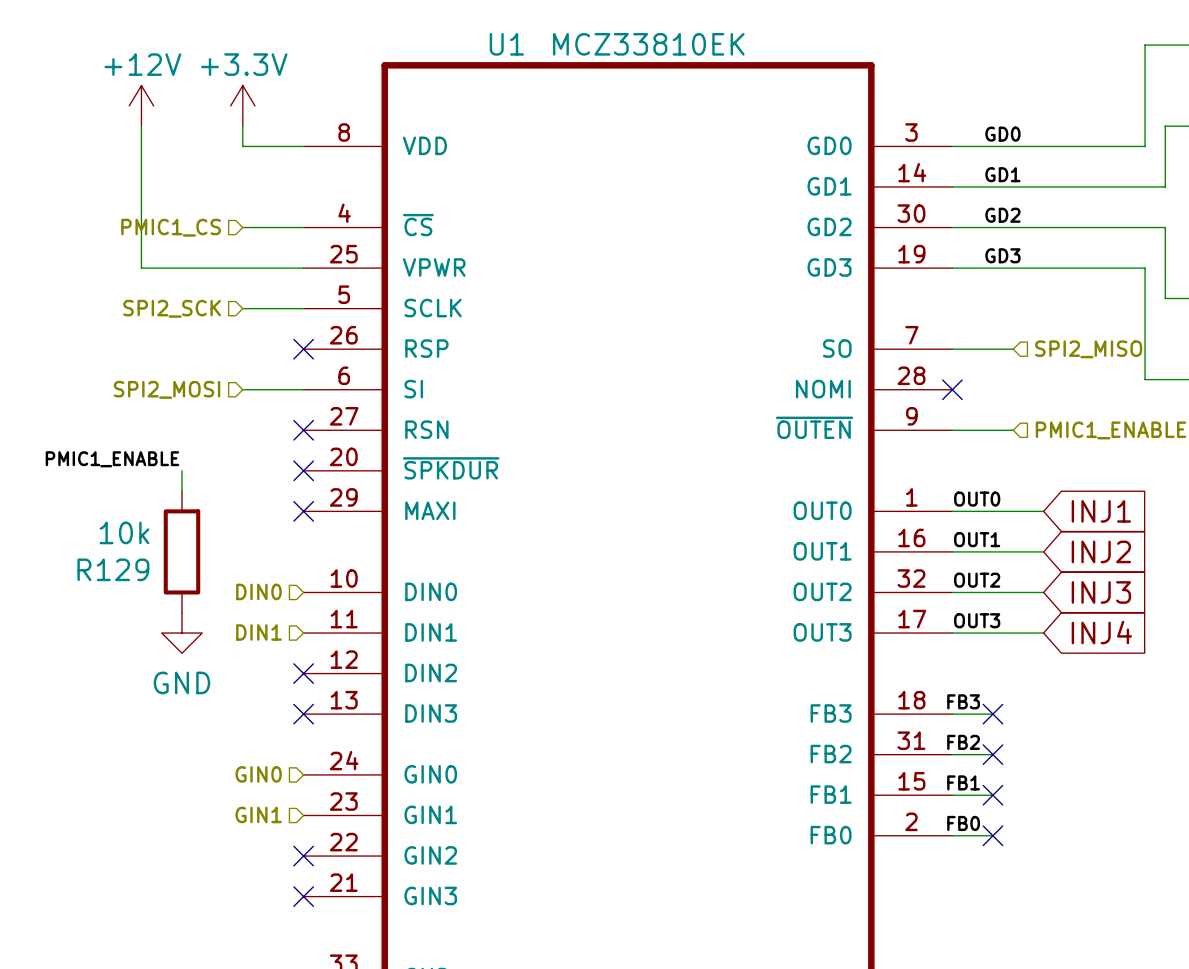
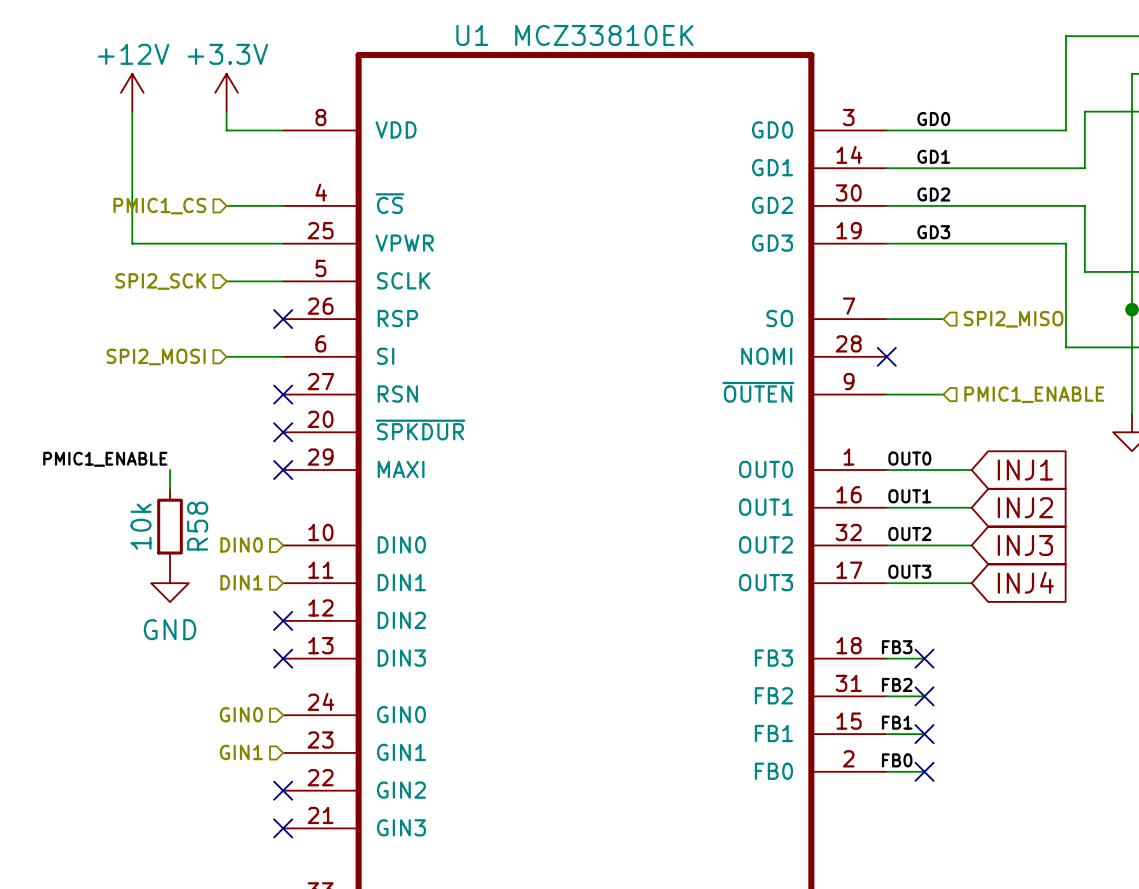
label position: PMIC1_ENABLE (112, 459) -> PMIC1_ENABLE (105, 459)
wire: (181, 470) (181, 491) -> (170, 470) (170, 488)
R129: 10k (181, 551) -> none
R58: none -> 10k (170, 526)

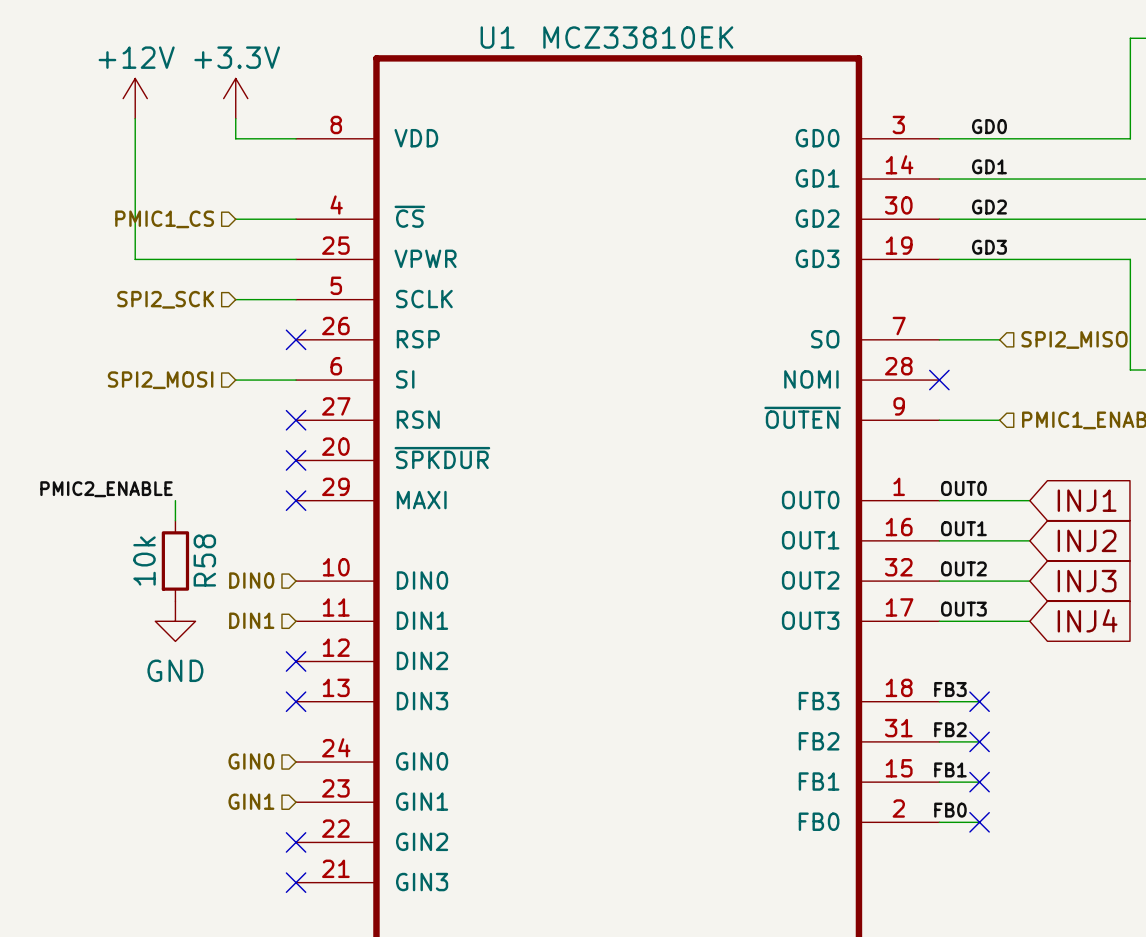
label: PMIC1_ENABLE (105, 459) -> PMIC2_ENABLE (106, 489)

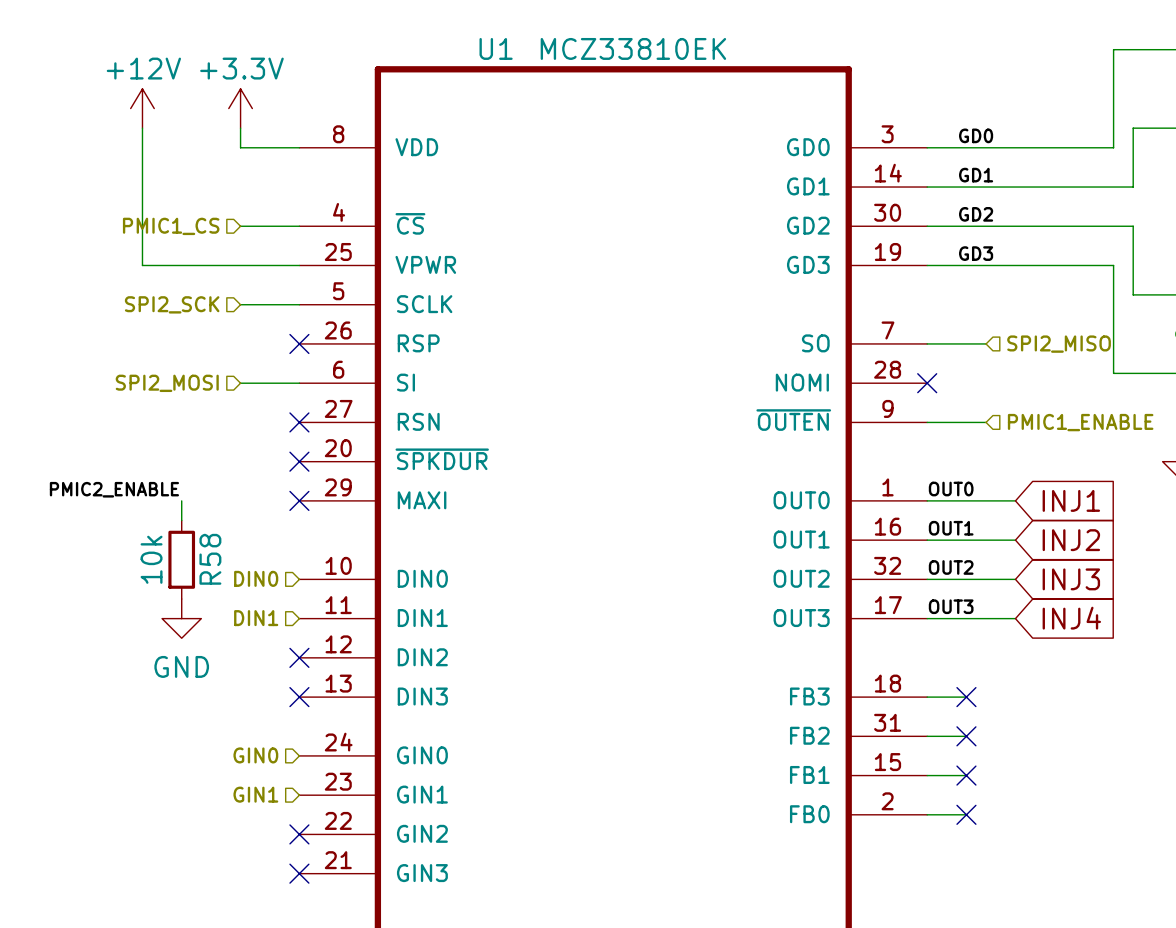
label: FB3 (950, 689) -> none
label: FB2 (950, 729) -> none
label: FB1 (950, 769) -> none
label: FB0 (950, 810) -> none

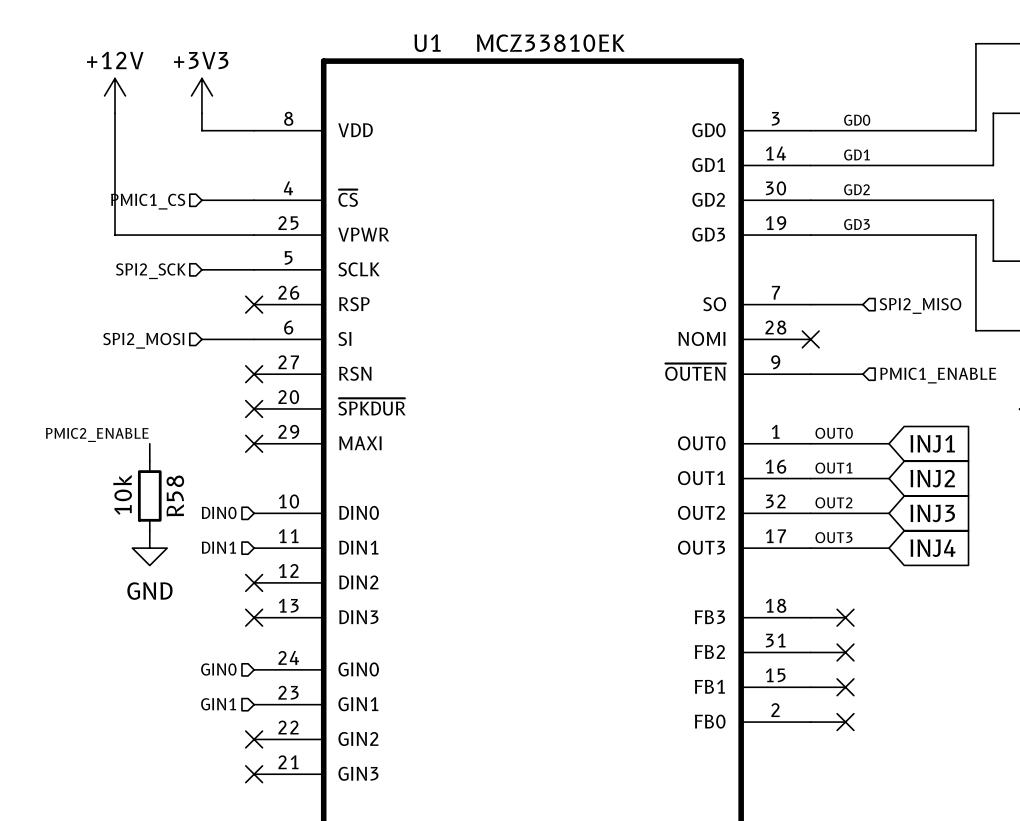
power symbol: +3.3V (240, 108) -> +3V3 (201, 95)

